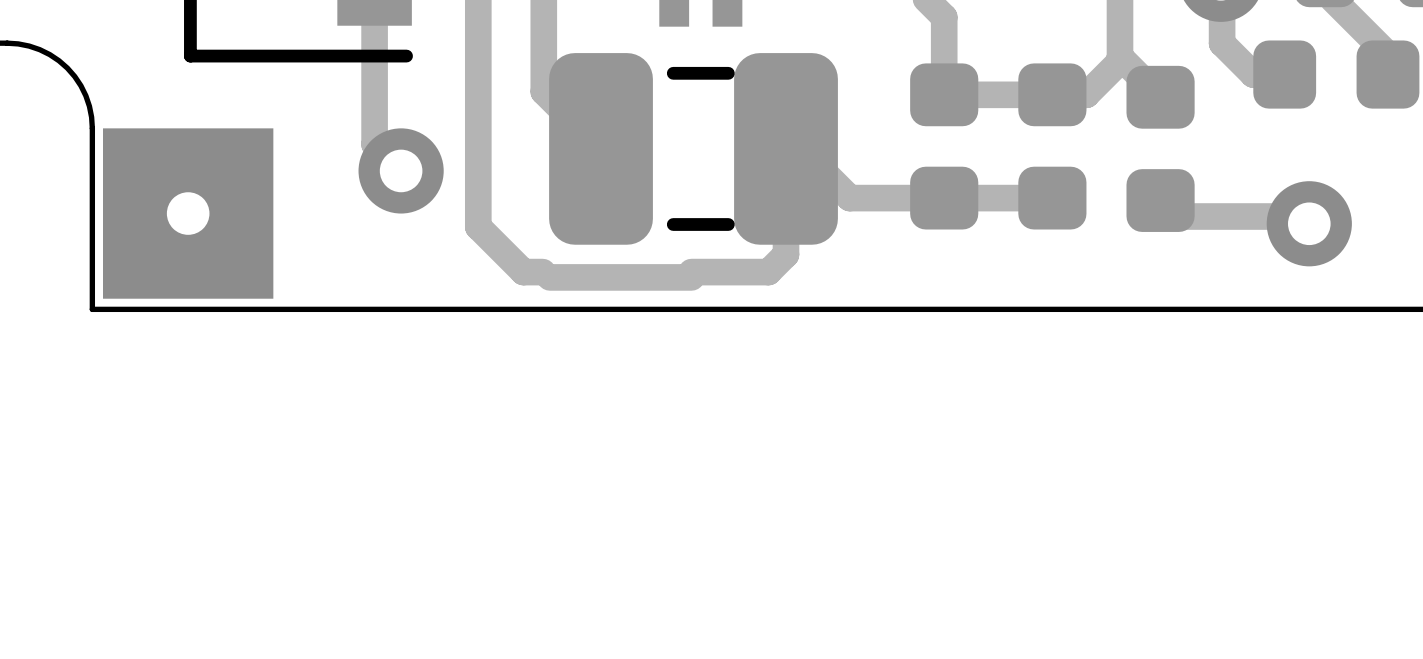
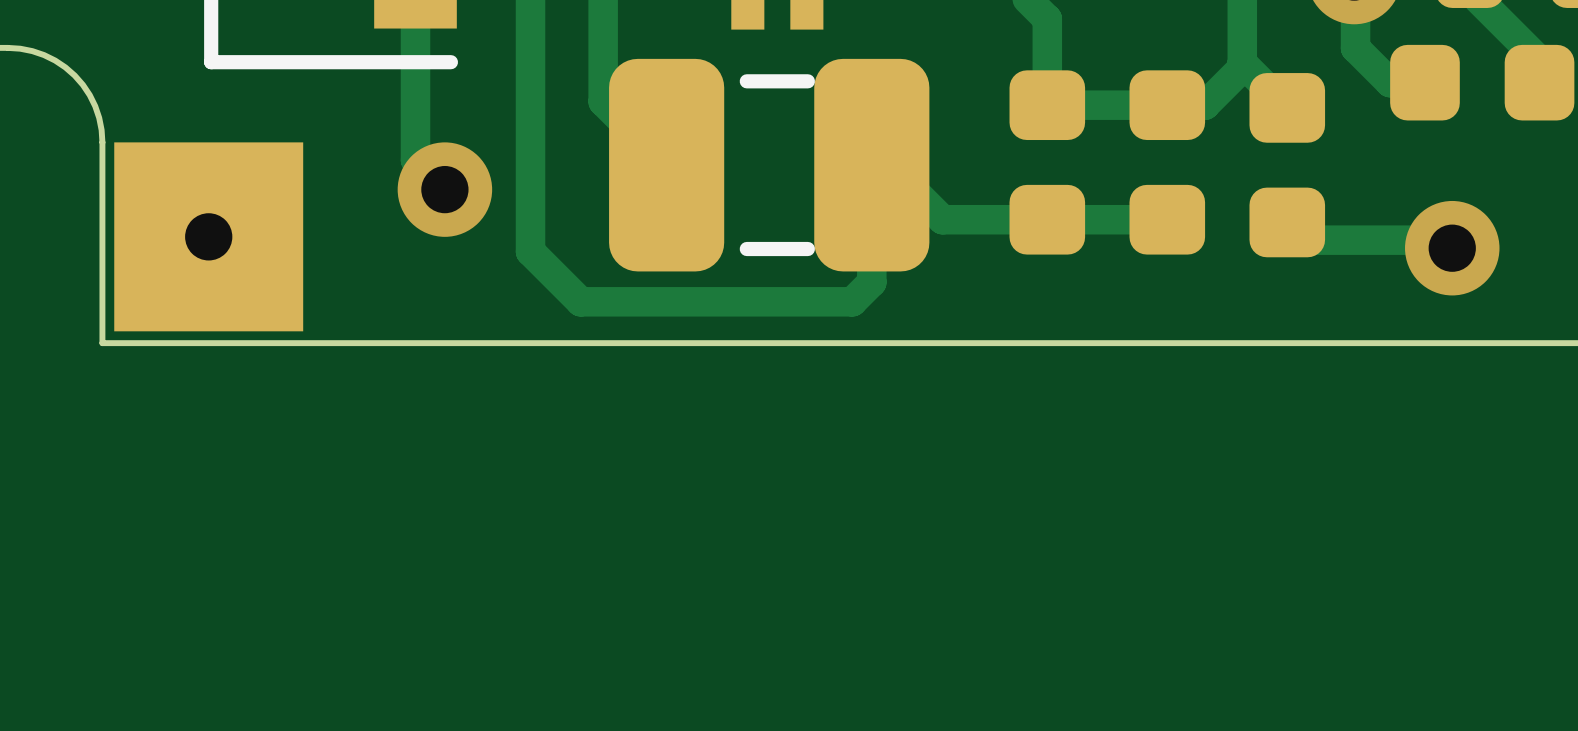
track: none -> (601, 301) (767, 301)
track: (549, 277) (691, 277) -> none

